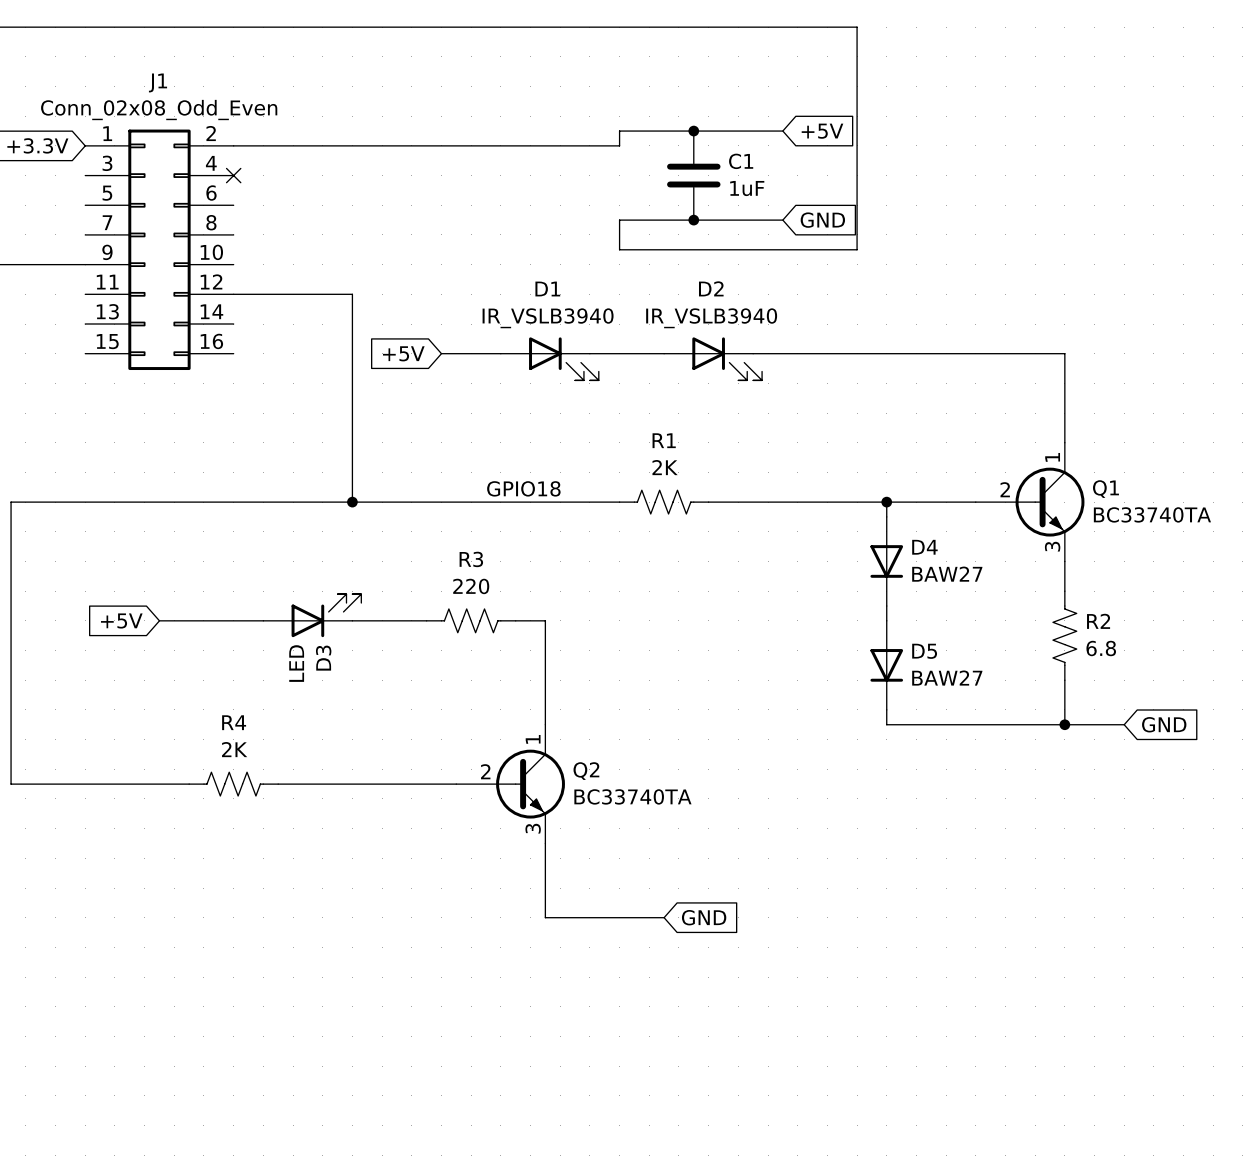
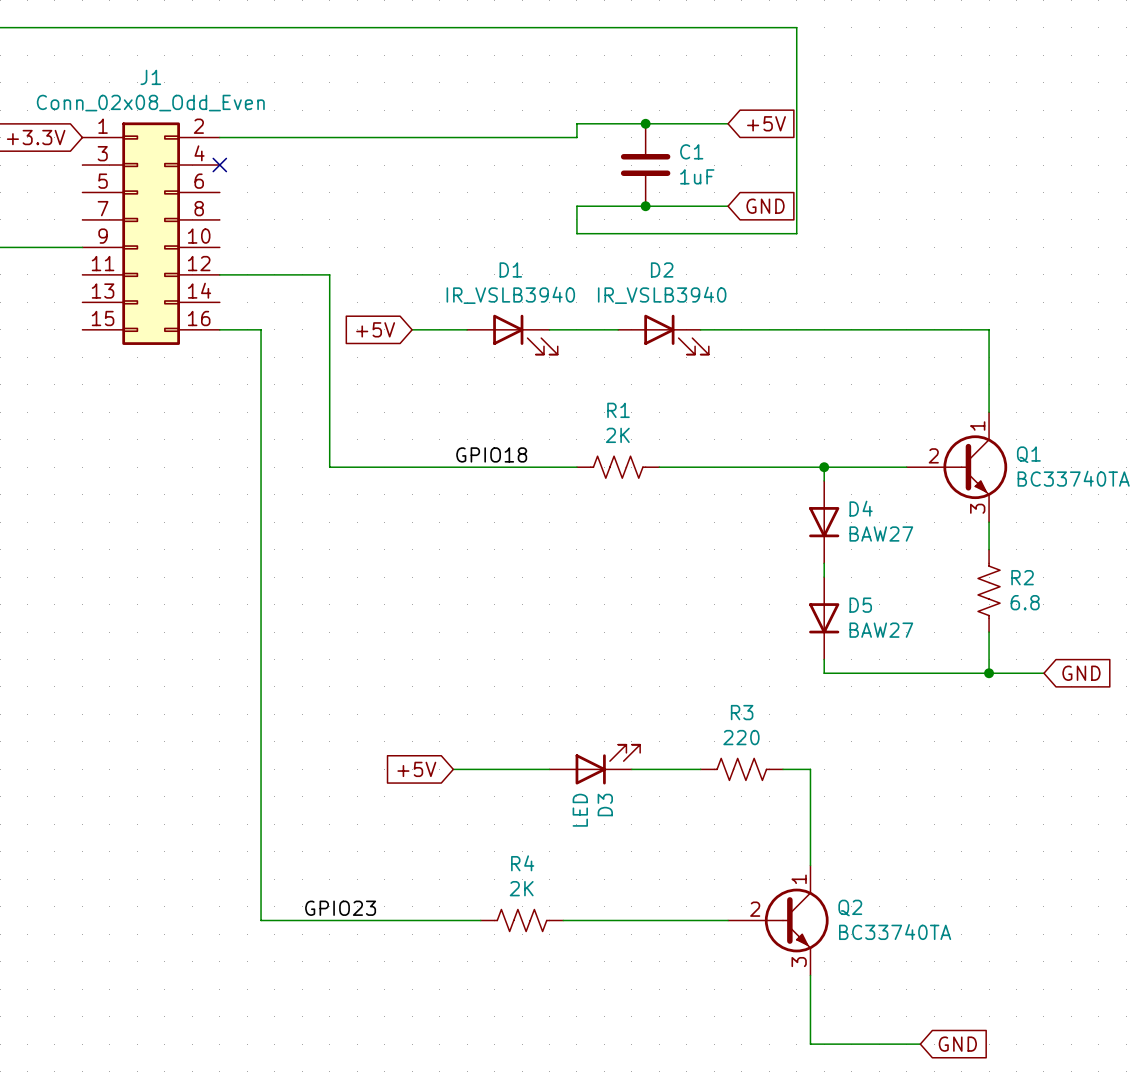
wire: none -> (219, 329) (261, 329) (261, 920) (480, 920)
wire: (352, 502) (11, 502) (11, 784) (189, 784) -> none
junction: (352, 502) -> none
D3 position: (312, 615) -> (594, 764)
global label: +5V (121, 620) -> none
wire: (159, 620) (263, 620) -> none
wire: (352, 620) (426, 620) -> none
R3 position: (471, 620) -> (741, 769)
wire: (515, 620) (545, 620) (545, 724) -> none
R4 position: (233, 784) -> (522, 920)
wire: (278, 784) (456, 784) -> none
Q2 position: (510, 784) -> (778, 920)
global label: none -> +5V (416, 769)
wire: none -> (453, 769) (549, 769)
wire: none -> (631, 769) (700, 769)
wire: none -> (783, 769) (810, 769) (810, 865)
wire: (545, 843) (545, 917) (664, 917) -> none
global label: GND (704, 917) -> none
label: none -> GPIO23 (340, 908)
wire: none -> (563, 920) (728, 920)
wire: none -> (810, 975) (810, 1044) (920, 1044)
global label: none -> GND (957, 1044)

